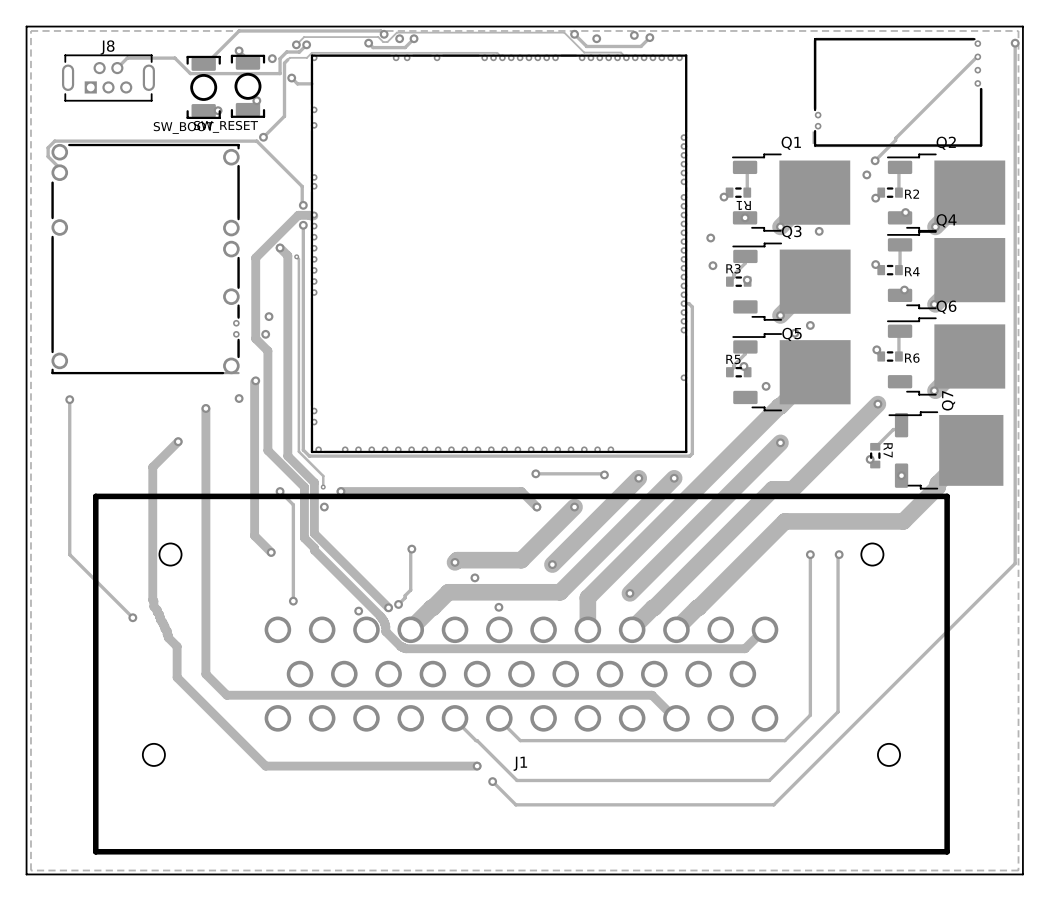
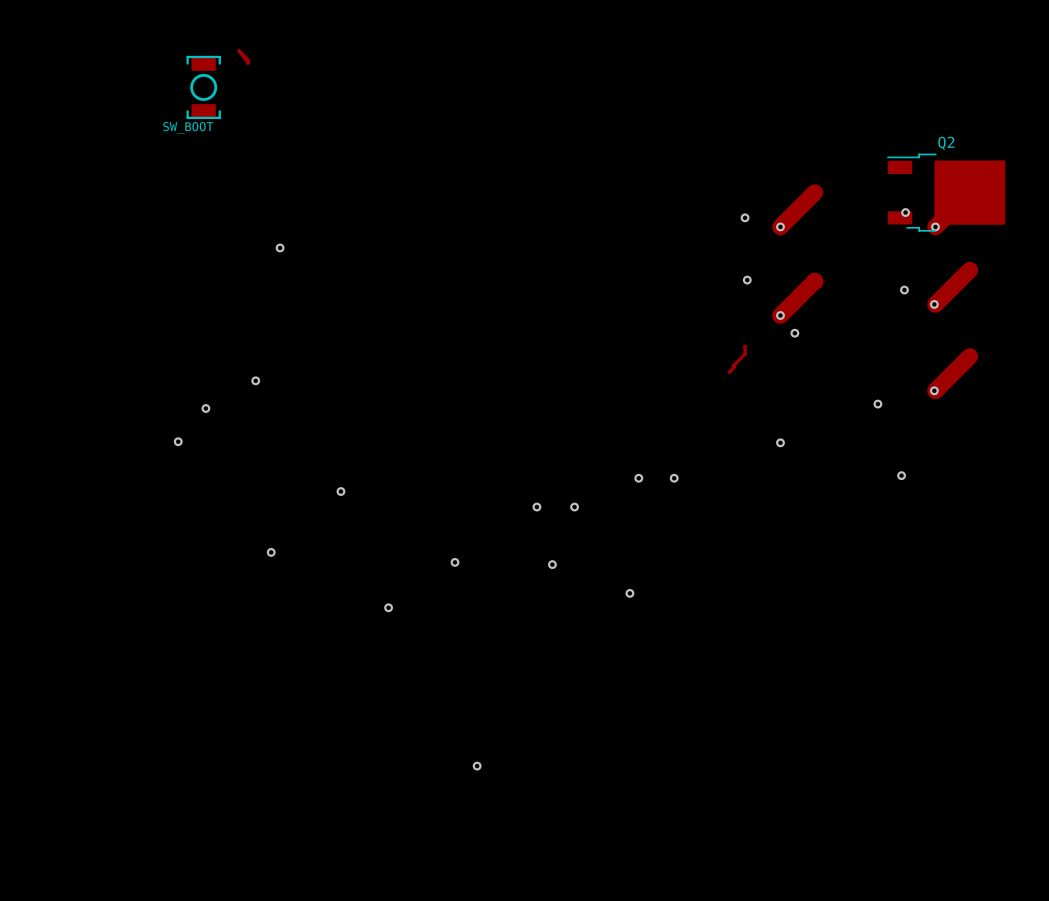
board edge: (26, 26) (1022, 26) (1022, 874) (26, 874) (26, 26) -> none
zone outline: (30, 30) (1018, 30) (1018, 870) (30, 870) (30, 30) -> none
track: (384, 34) (380, 30) (239, 30) (212, 57) -> none
via: (384, 34) -> none
track: (574, 34) (586, 46) (640, 46) (649, 37) -> none
via: (574, 34) -> none
via: (634, 35) -> none
via: (649, 37) -> none
via: (399, 38) -> none
track: (414, 38) (405, 47) (373, 47) (368, 43) -> none
via: (414, 38) -> none
via: (596, 38) -> none
via: (368, 43) -> none
track: (1015, 43) (1015, 563) (773, 804) (515, 804) (492, 781) -> none
via: (1015, 43) -> none
track: (296, 44) (304, 37) (378, 37) (383, 42) (387, 42) (396, 32) (564, 32) (584, 52) (621, 52) (626, 57) -> none
via: (296, 44) -> none
track: (306, 44) (299, 52) (286, 52) (280, 58) (280, 73) (190, 73) (174, 58) (127, 58) (117, 68) -> none
via: (306, 44) -> none
via: (239, 50) -> none
track: (977, 56) (875, 160) -> none
track: (502, 57) (497, 52) (311, 52) (306, 57) (289, 57) (284, 63) (284, 116) (263, 137) -> none
via: (272, 58) -> none
J8: (108, 78) -> none
track: (291, 78) (297, 83) (311, 83) -> none
via: (291, 78) -> none
SW_RESET: (247, 86) -> none
part: (897, 92) -> none
via: (256, 100) -> none
via: (218, 110) -> none
via: (263, 137) -> none
via: (875, 160) -> none
track: (745, 167) (747, 169) (747, 192) -> none
track: (900, 167) (898, 192) -> none
track: (59, 172) (59, 168) (48, 156) (48, 147) (54, 141) (256, 141) (302, 186) (302, 205) -> none
via: (866, 174) -> none
R1: (738, 192) -> none
Q1: (791, 192) -> none
R2: (890, 192) -> none
via: (724, 197) -> none
via: (875, 198) -> none
via: (303, 205) -> none
track: (313, 215) (298, 215) (255, 257) (255, 338) (267, 350) (267, 450) (304, 487) (304, 538) (380, 616) (385, 624) (385, 631) (400, 646) (405, 648) (745, 648) (763, 629) -> none
track: (303, 225) (303, 450) (309, 456) (689, 456) (692, 453) (692, 306) (687, 303) -> none
via: (303, 225) -> none
via: (819, 231) -> none
via: (710, 238) -> none
track: (900, 244) (898, 270) -> none
track: (280, 247) (287, 255) (287, 456) (314, 482) (314, 533) (388, 607) -> none
part: (499, 253) -> none
track: (296, 256) (298, 259) (298, 451) (323, 476) (323, 487) -> none
via: (296, 256) -> none
track: (745, 256) (745, 263) (729, 281) -> none
part: (145, 259) -> none
via: (875, 264) -> none
via: (712, 265) -> none
R4: (890, 270) -> none
Q4: (946, 270) -> none
R3: (738, 281) -> none
Q3: (791, 281) -> none
via: (269, 316) -> none
via: (810, 325) -> none
track: (900, 331) (898, 356) -> none
via: (265, 334) -> none
via: (876, 349) -> none
R6: (890, 356) -> none
Q6: (946, 356) -> none
via: (743, 366) -> none
R5: (738, 372) -> none
Q5: (791, 372) -> none
track: (815, 372) (587, 597) (587, 624) -> none
track: (254, 381) (254, 535) (271, 552) -> none
via: (766, 386) -> none
via: (239, 398) -> none
track: (69, 399) (69, 554) (132, 617) -> none
via: (69, 399) -> none
track: (877, 404) (792, 489) (772, 489) (632, 628) -> none
track: (205, 408) (205, 674) (226, 695) (652, 695) (675, 718) -> none
track: (901, 425) (901, 429) (893, 429) (875, 446) -> none
track: (178, 441) (152, 467) (152, 600) (153, 606) (167, 631) (168, 637) (177, 646) (177, 677) (265, 766) (477, 766) -> none
track: (780, 442) (629, 593) -> none
Q7: (946, 450) -> none
track: (971, 450) (903, 521) (784, 521) (676, 628) -> none
R7: (875, 455) -> none
via: (870, 459) -> none
track: (535, 473) (603, 474) -> none
via: (535, 473) -> none
via: (604, 474) -> none
track: (638, 478) (552, 564) -> none
track: (674, 478) (560, 592) (448, 592) (410, 628) -> none
via: (323, 487) -> none
track: (280, 491) (293, 504) (293, 601) -> none
via: (280, 491) -> none
track: (340, 491) (521, 491) (536, 507) -> none
via: (324, 507) -> none
track: (574, 507) (521, 560) (457, 560) (455, 562) -> none
via: (411, 549) -> none
track: (410, 550) (410, 590) (398, 604) -> none
track: (810, 554) (810, 715) (784, 740) (520, 740) (499, 719) -> none
via: (810, 554) -> none
via: (839, 554) -> none
track: (838, 555) (838, 711) (769, 780) (516, 780) (455, 719) -> none
via: (474, 577) -> none
via: (293, 601) -> none
via: (398, 604) -> none
via: (498, 607) -> none
via: (358, 611) -> none
via: (132, 617) -> none
J1: (521, 674) -> none
via: (492, 781) -> none

